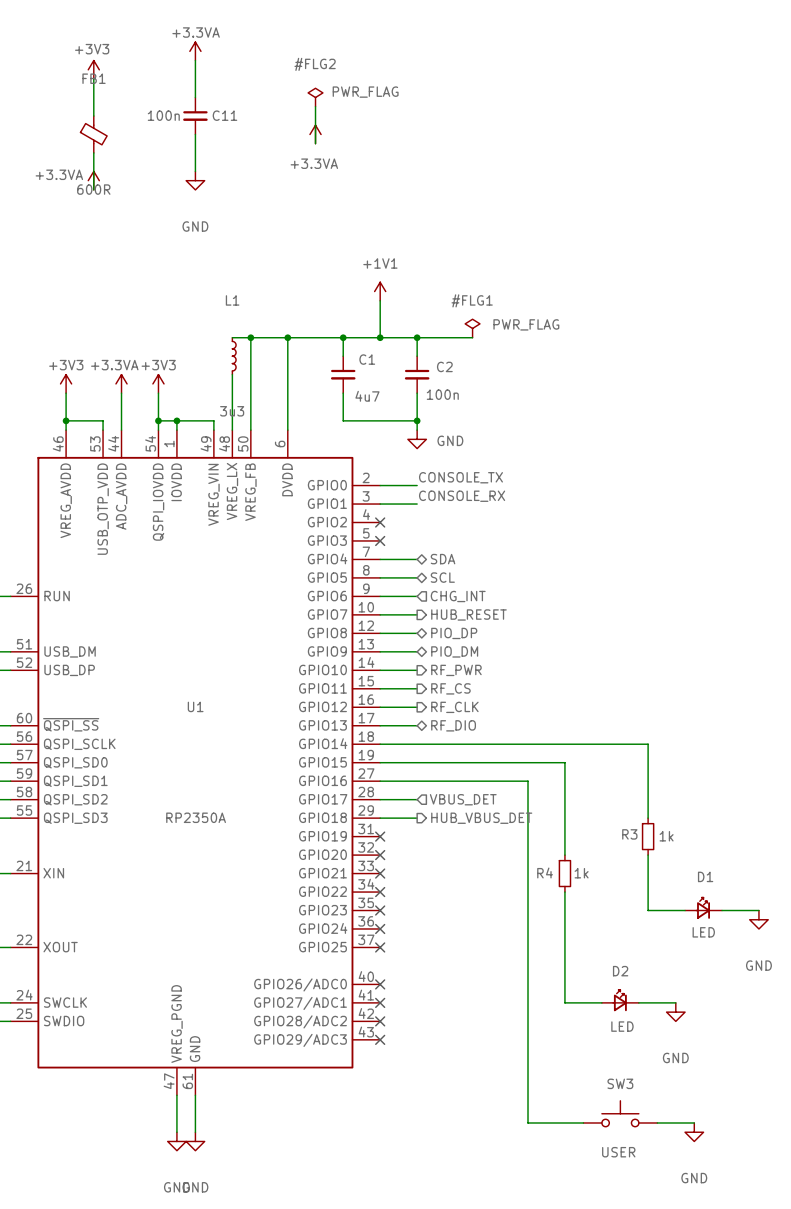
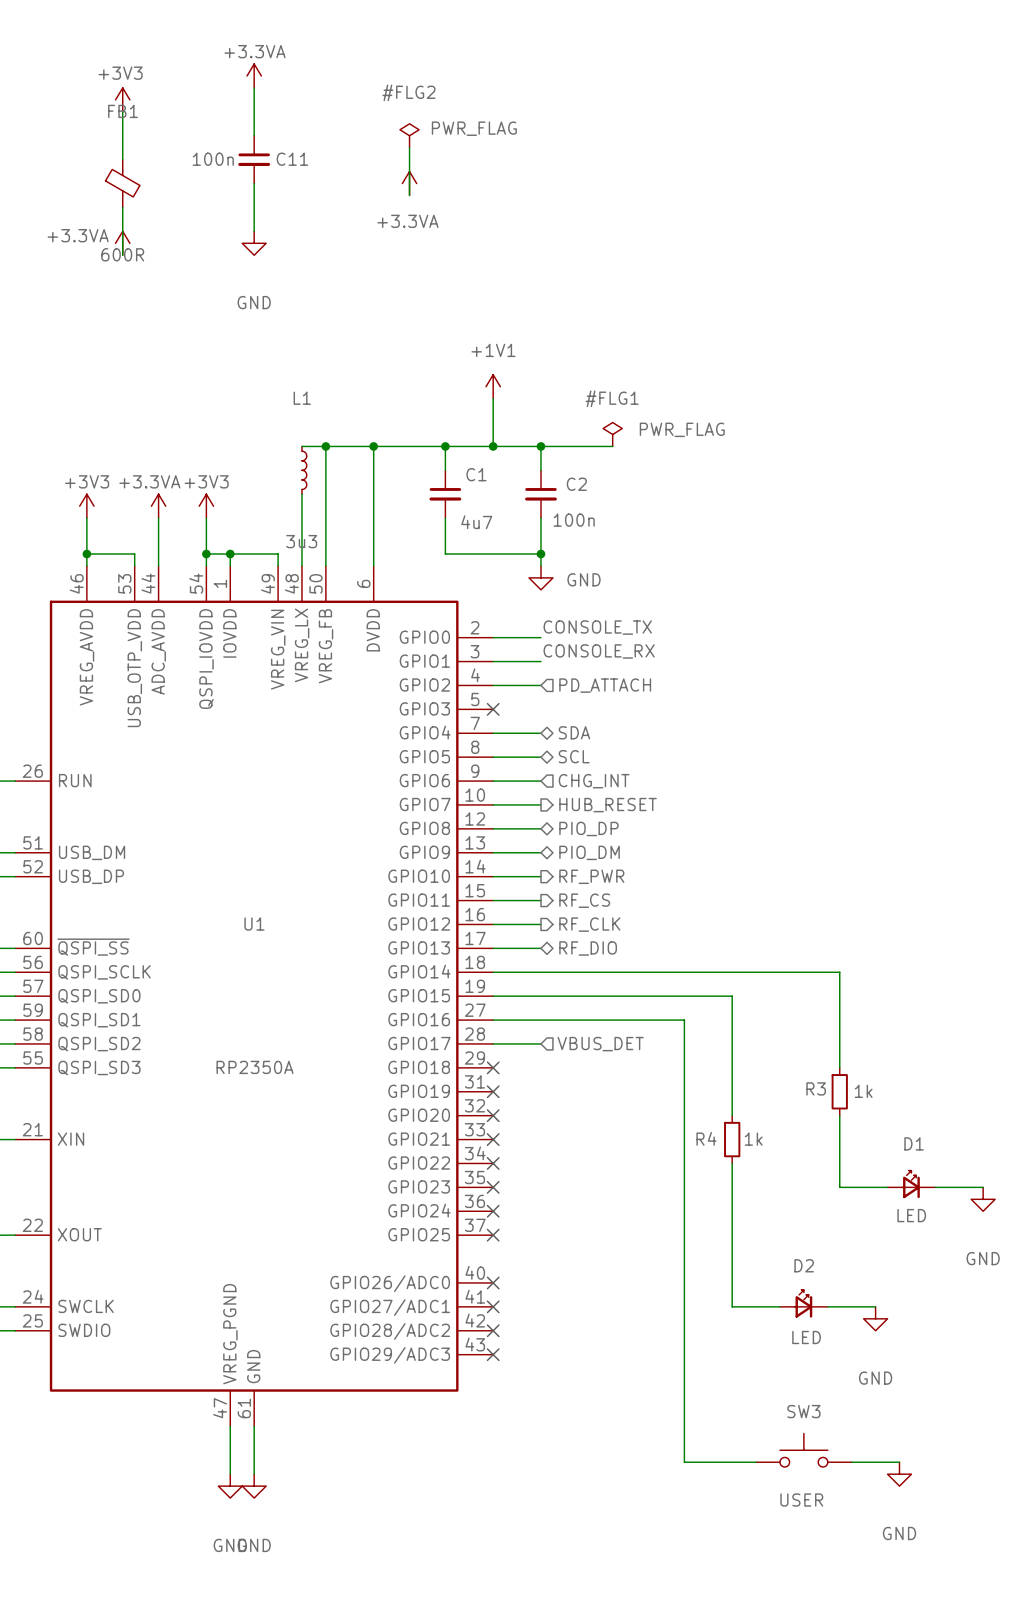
wire: none -> (493, 685) (540, 685)
no-connect mark: (380, 522) -> none
hierarchical label: none -> PD_ATTACH (605, 685)
wire: (380, 818) (417, 818) -> none
no-connect mark: none -> (493, 1067)
hierarchical label: HUB_VBUS_DET (481, 818) -> none

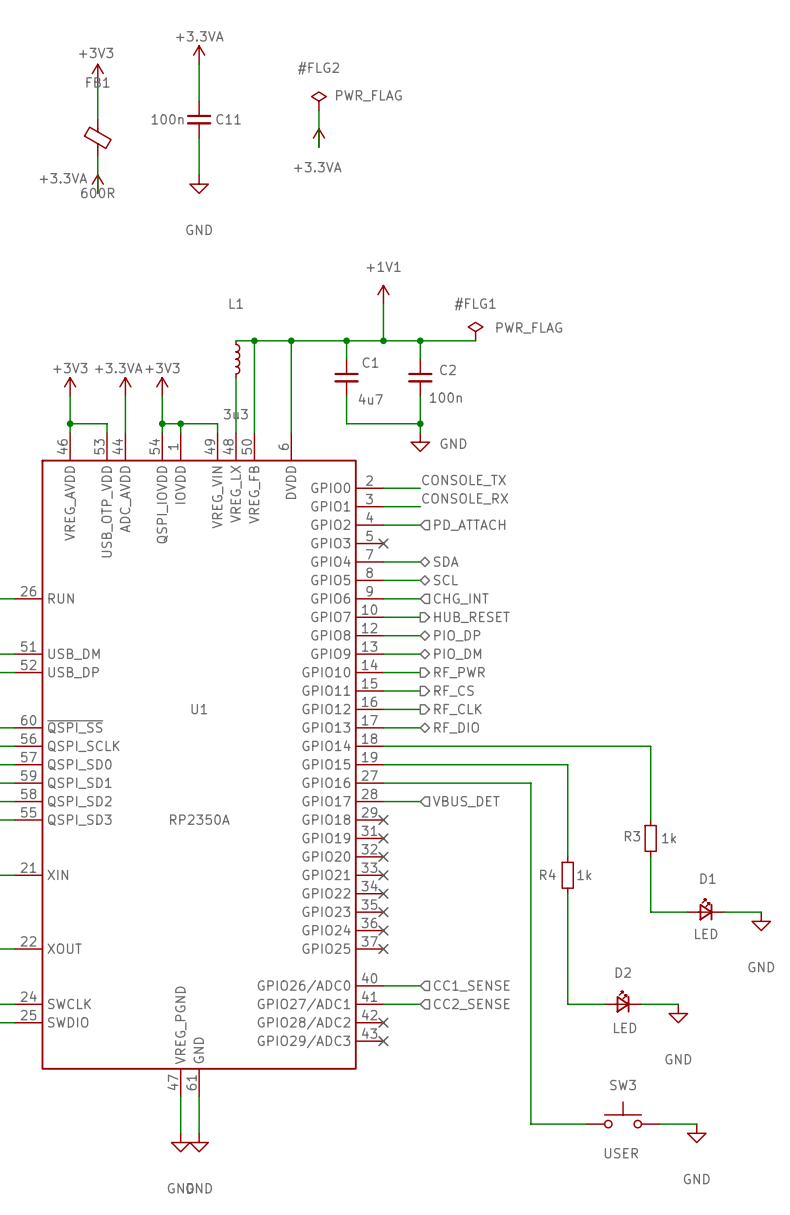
wire: none -> (383, 985) (420, 985)
no-connect mark: (493, 1282) -> none
hierarchical label: none -> CC1_SENSE (471, 985)
wire: none -> (383, 1004) (420, 1004)
no-connect mark: (493, 1306) -> none
hierarchical label: none -> CC2_SENSE (471, 1004)

